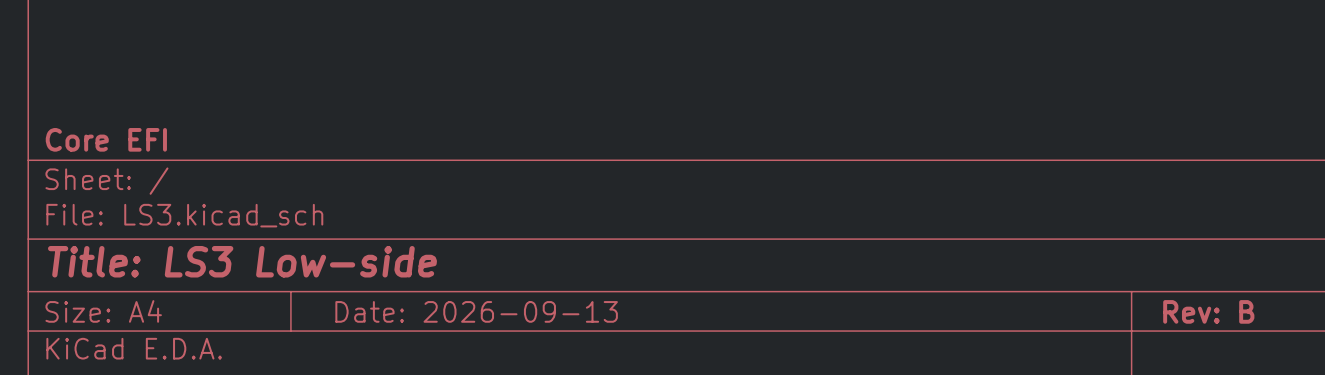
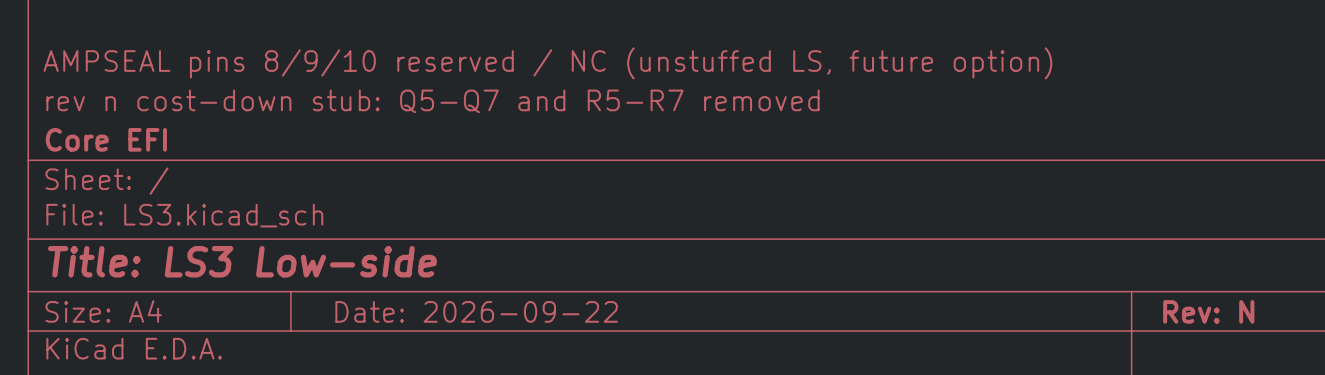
title block: none -> AMPSEAL pins 8/9/10 reserved / NC (unstuffed LS, future option) (547, 63)
title block: none -> rev n cost-down stub: Q5-Q7 and R5-R7 removed (432, 101)
title block: Date: 2026-09-13 (476, 311) -> Date: 2026-09-22 (476, 311)
title block: Rev: B (1208, 311) -> Rev: N (1208, 311)

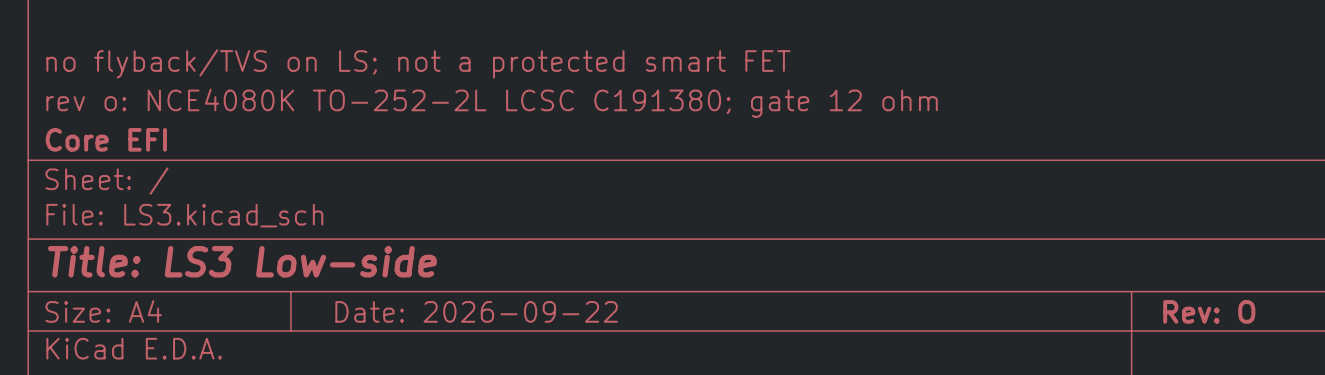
title block: AMPSEAL pins 8/9/10 reserved / NC (unstuffed LS, future option) (547, 63) -> no flyback/TVS on LS; not a protected smart FET (418, 63)
title block: rev n cost-down stub: Q5-Q7 and R5-R7 removed (432, 101) -> rev o: NCE4080K TO-252-2L LCSC C191380; gate 12 ohm (492, 103)
title block: Rev: N (1208, 311) -> Rev: O (1209, 311)

